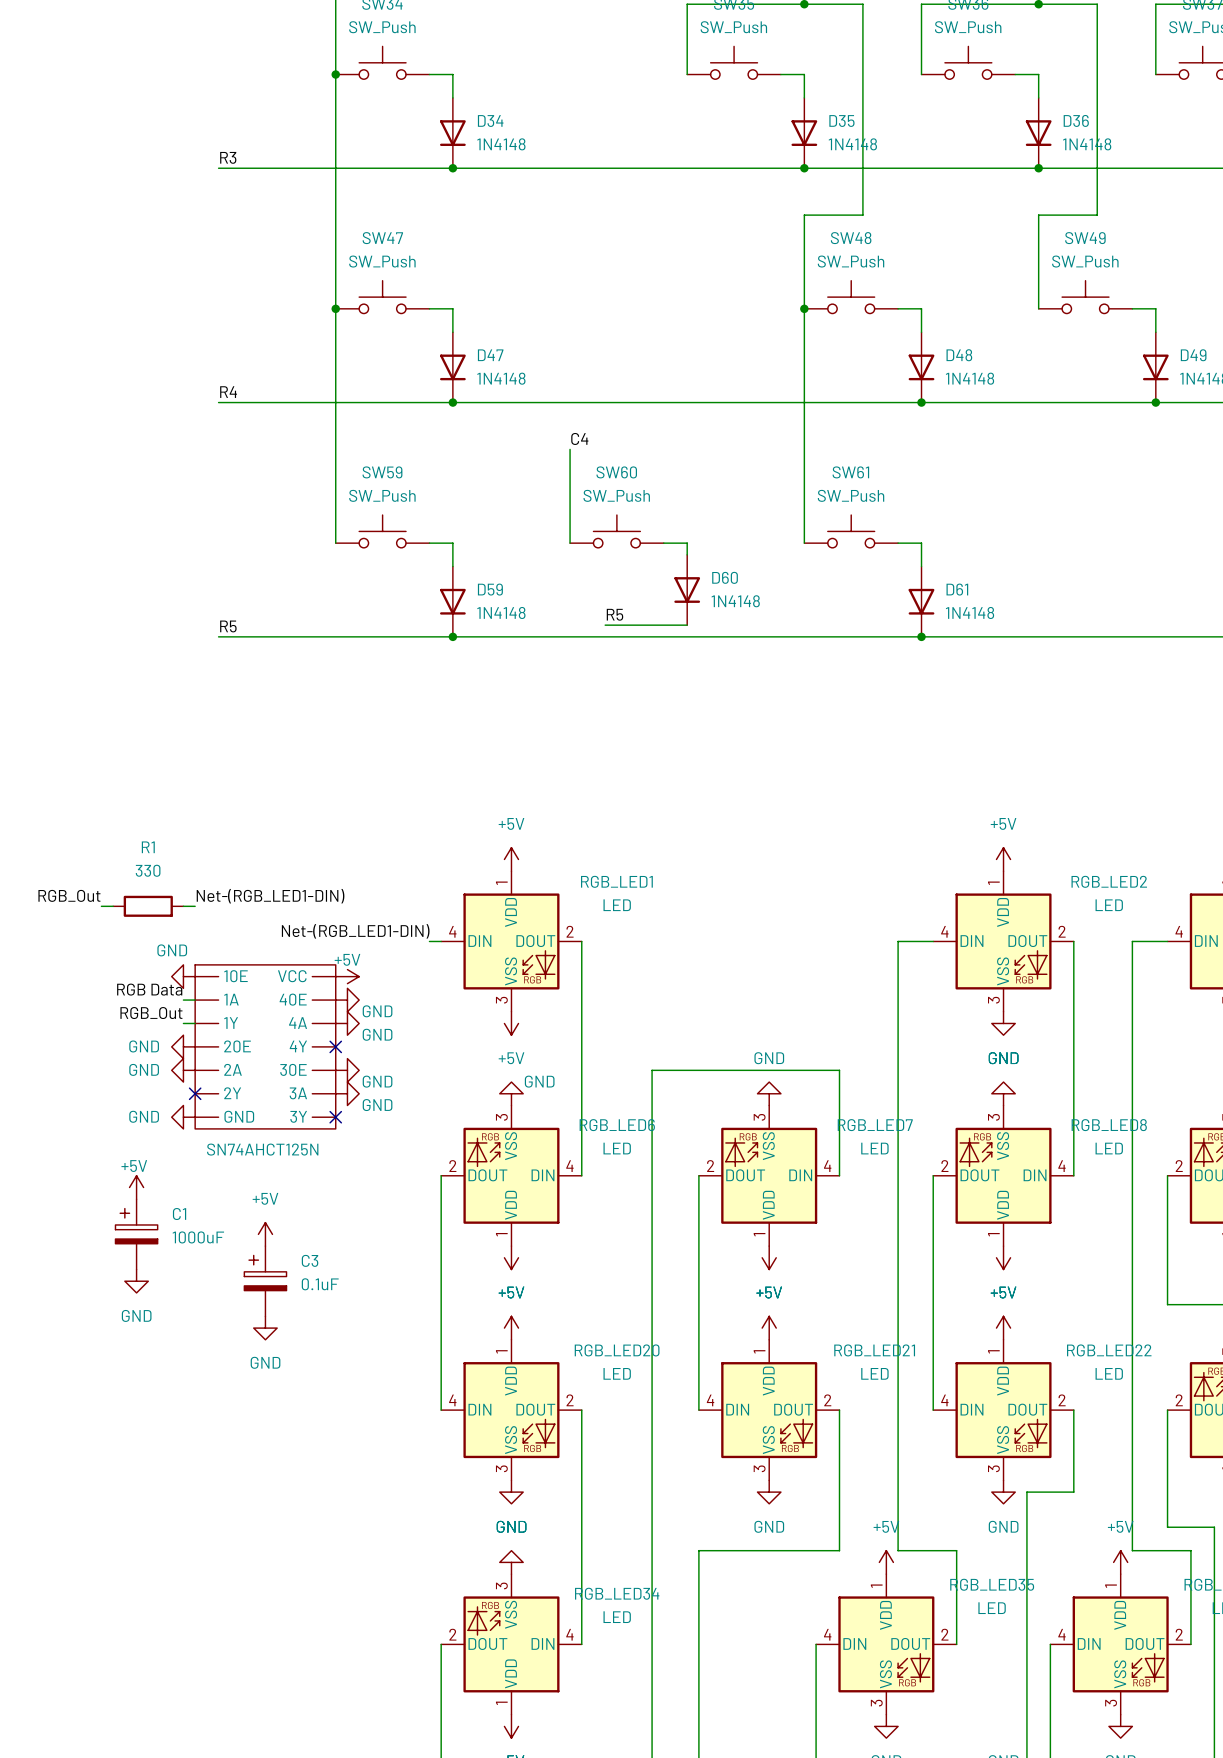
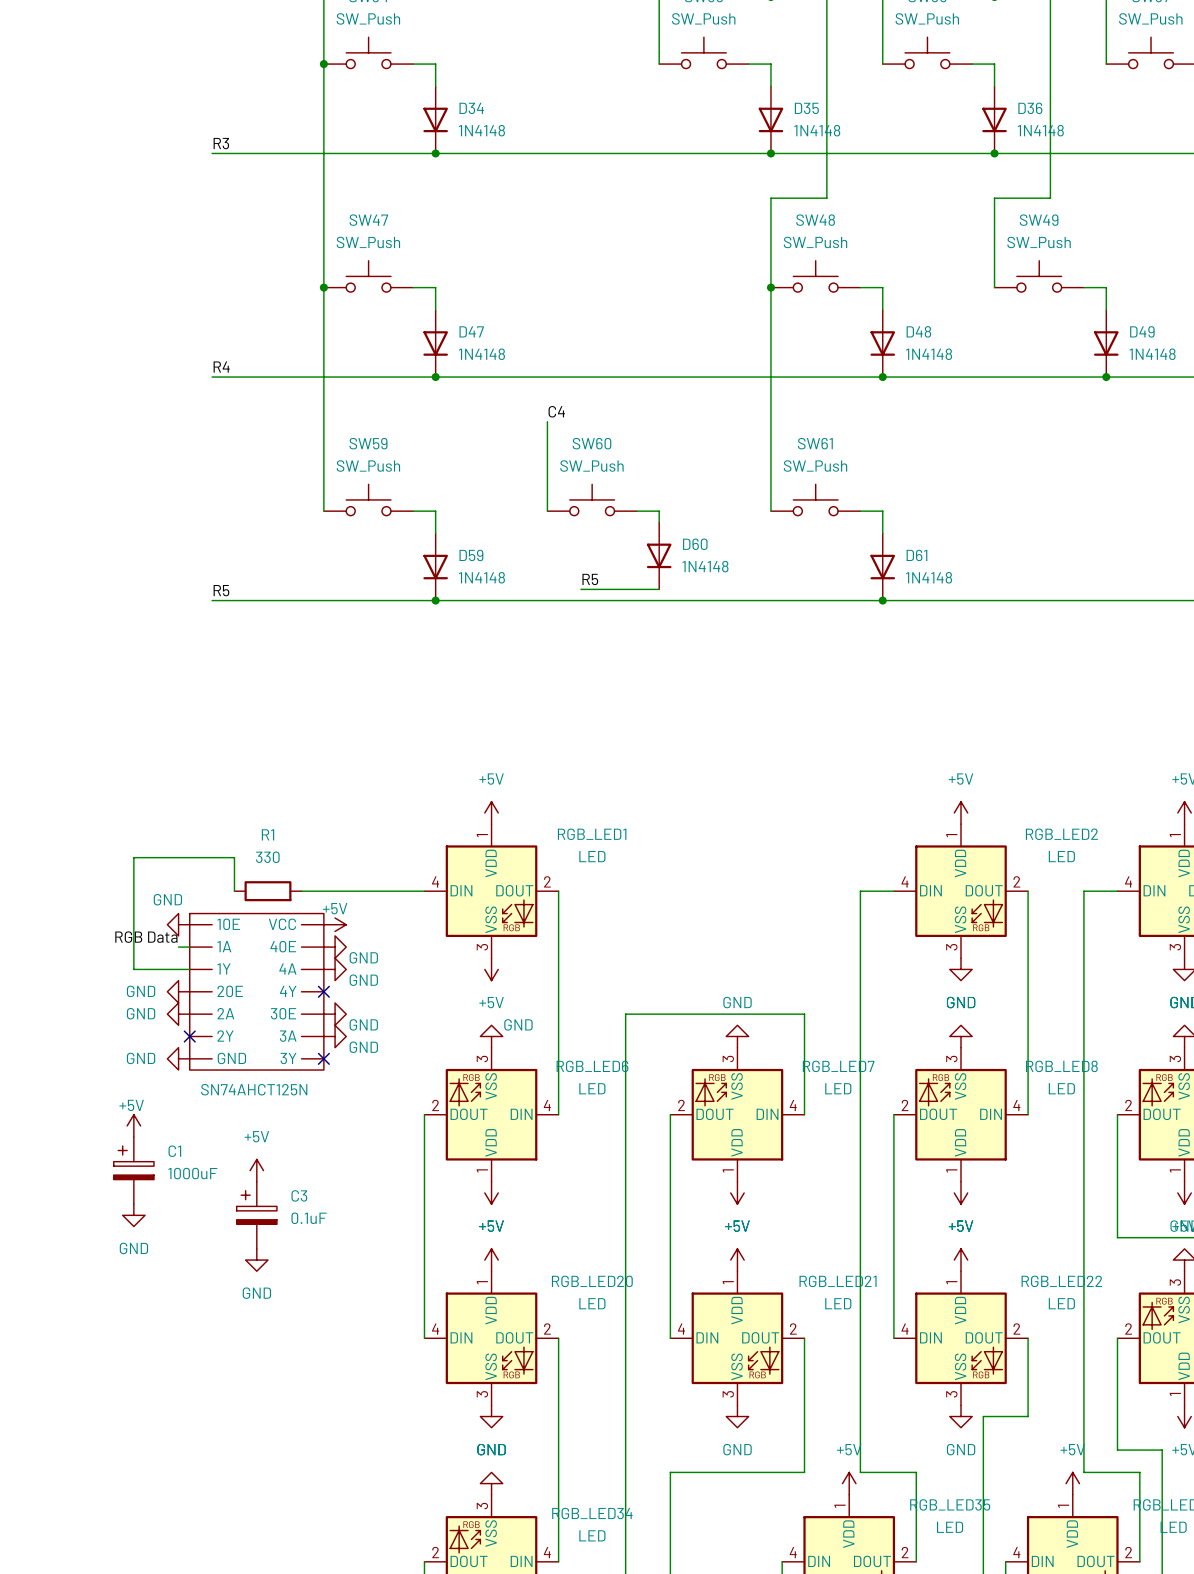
label: RGB_Out (69, 895) -> none
label: Net-(RGB_LED1-DIN) (270, 896) -> none
wire: (101, 906) (113, 906) -> none
R1 position: (148, 906) -> (267, 891)
wire: none -> (178, 857) (133, 857) (133, 969) (178, 969)
wire: none -> (189, 857) (234, 857) (234, 891)
label: Net-(RGB_LED1-DIN) (355, 931) -> none
wire: none -> (301, 891) (413, 891)
label: RGB_Out (151, 1013) -> none

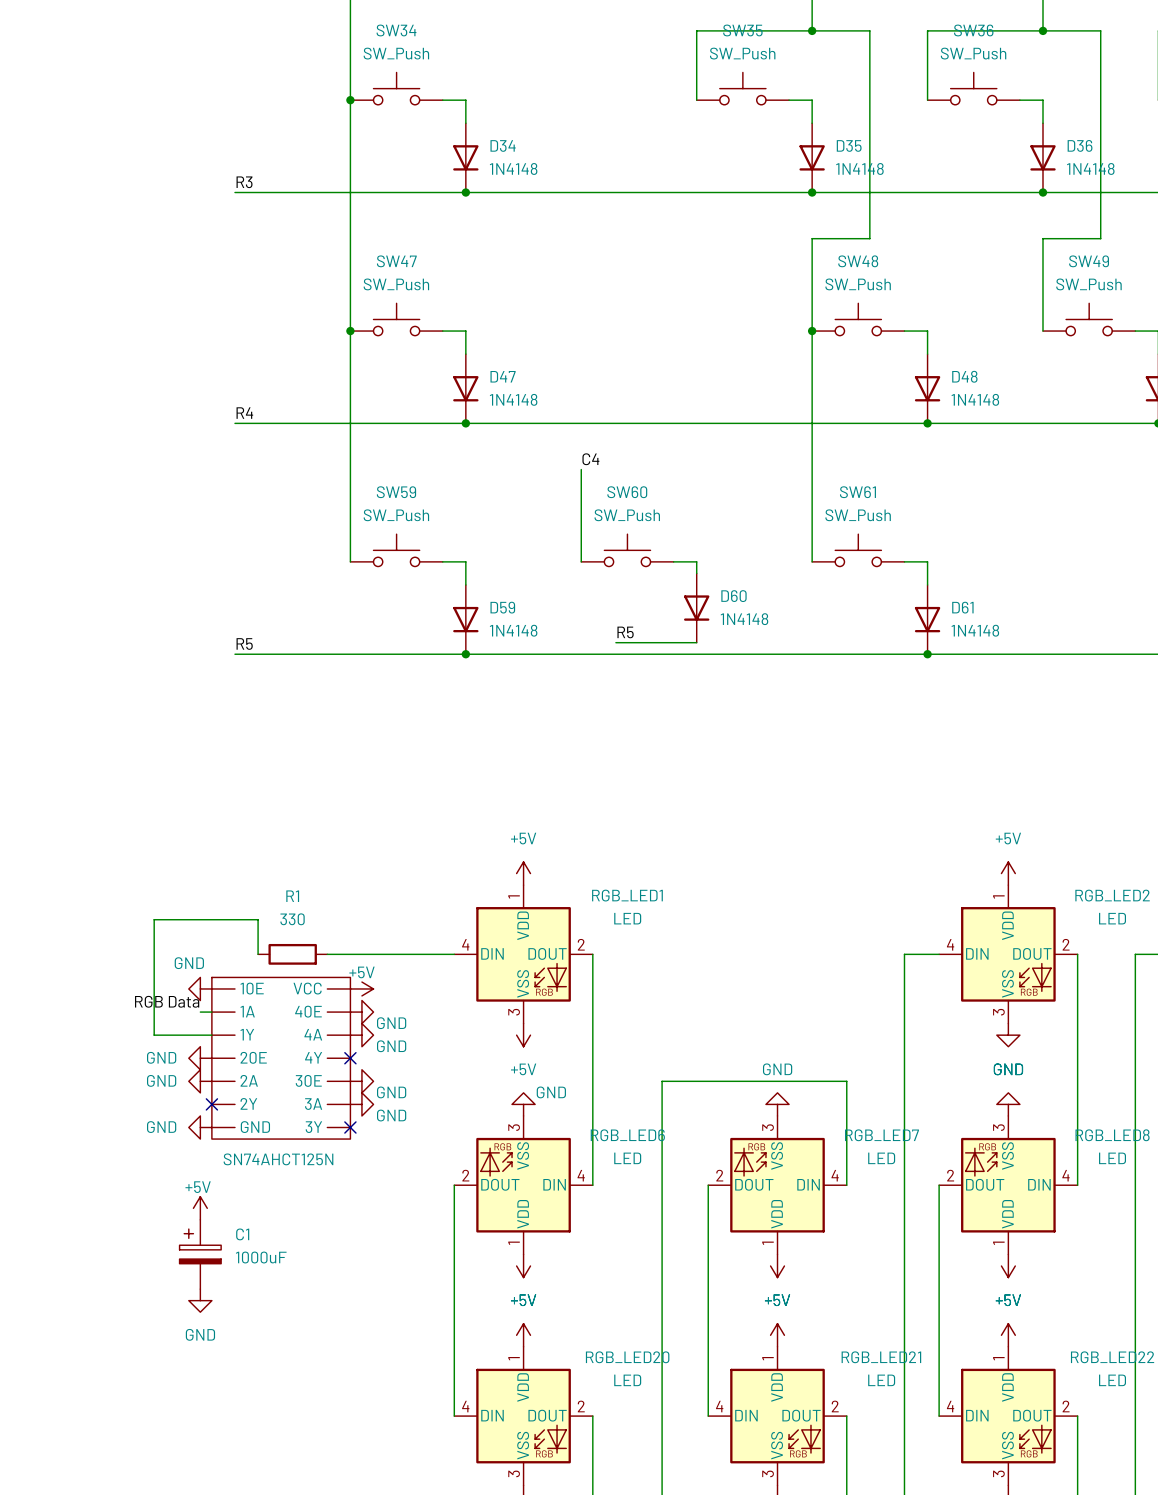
power symbol: +5V (133, 1125) -> none
power symbol: none -> +5V (200, 1208)
C1 position: (133, 1170) -> (200, 1254)
power symbol: +5V (256, 1170) -> none
power symbol: GND (133, 1215) -> none
C3: 0.1uF (256, 1215) -> none
power symbol: none -> GND (200, 1300)
power symbol: GND (256, 1260) -> none

